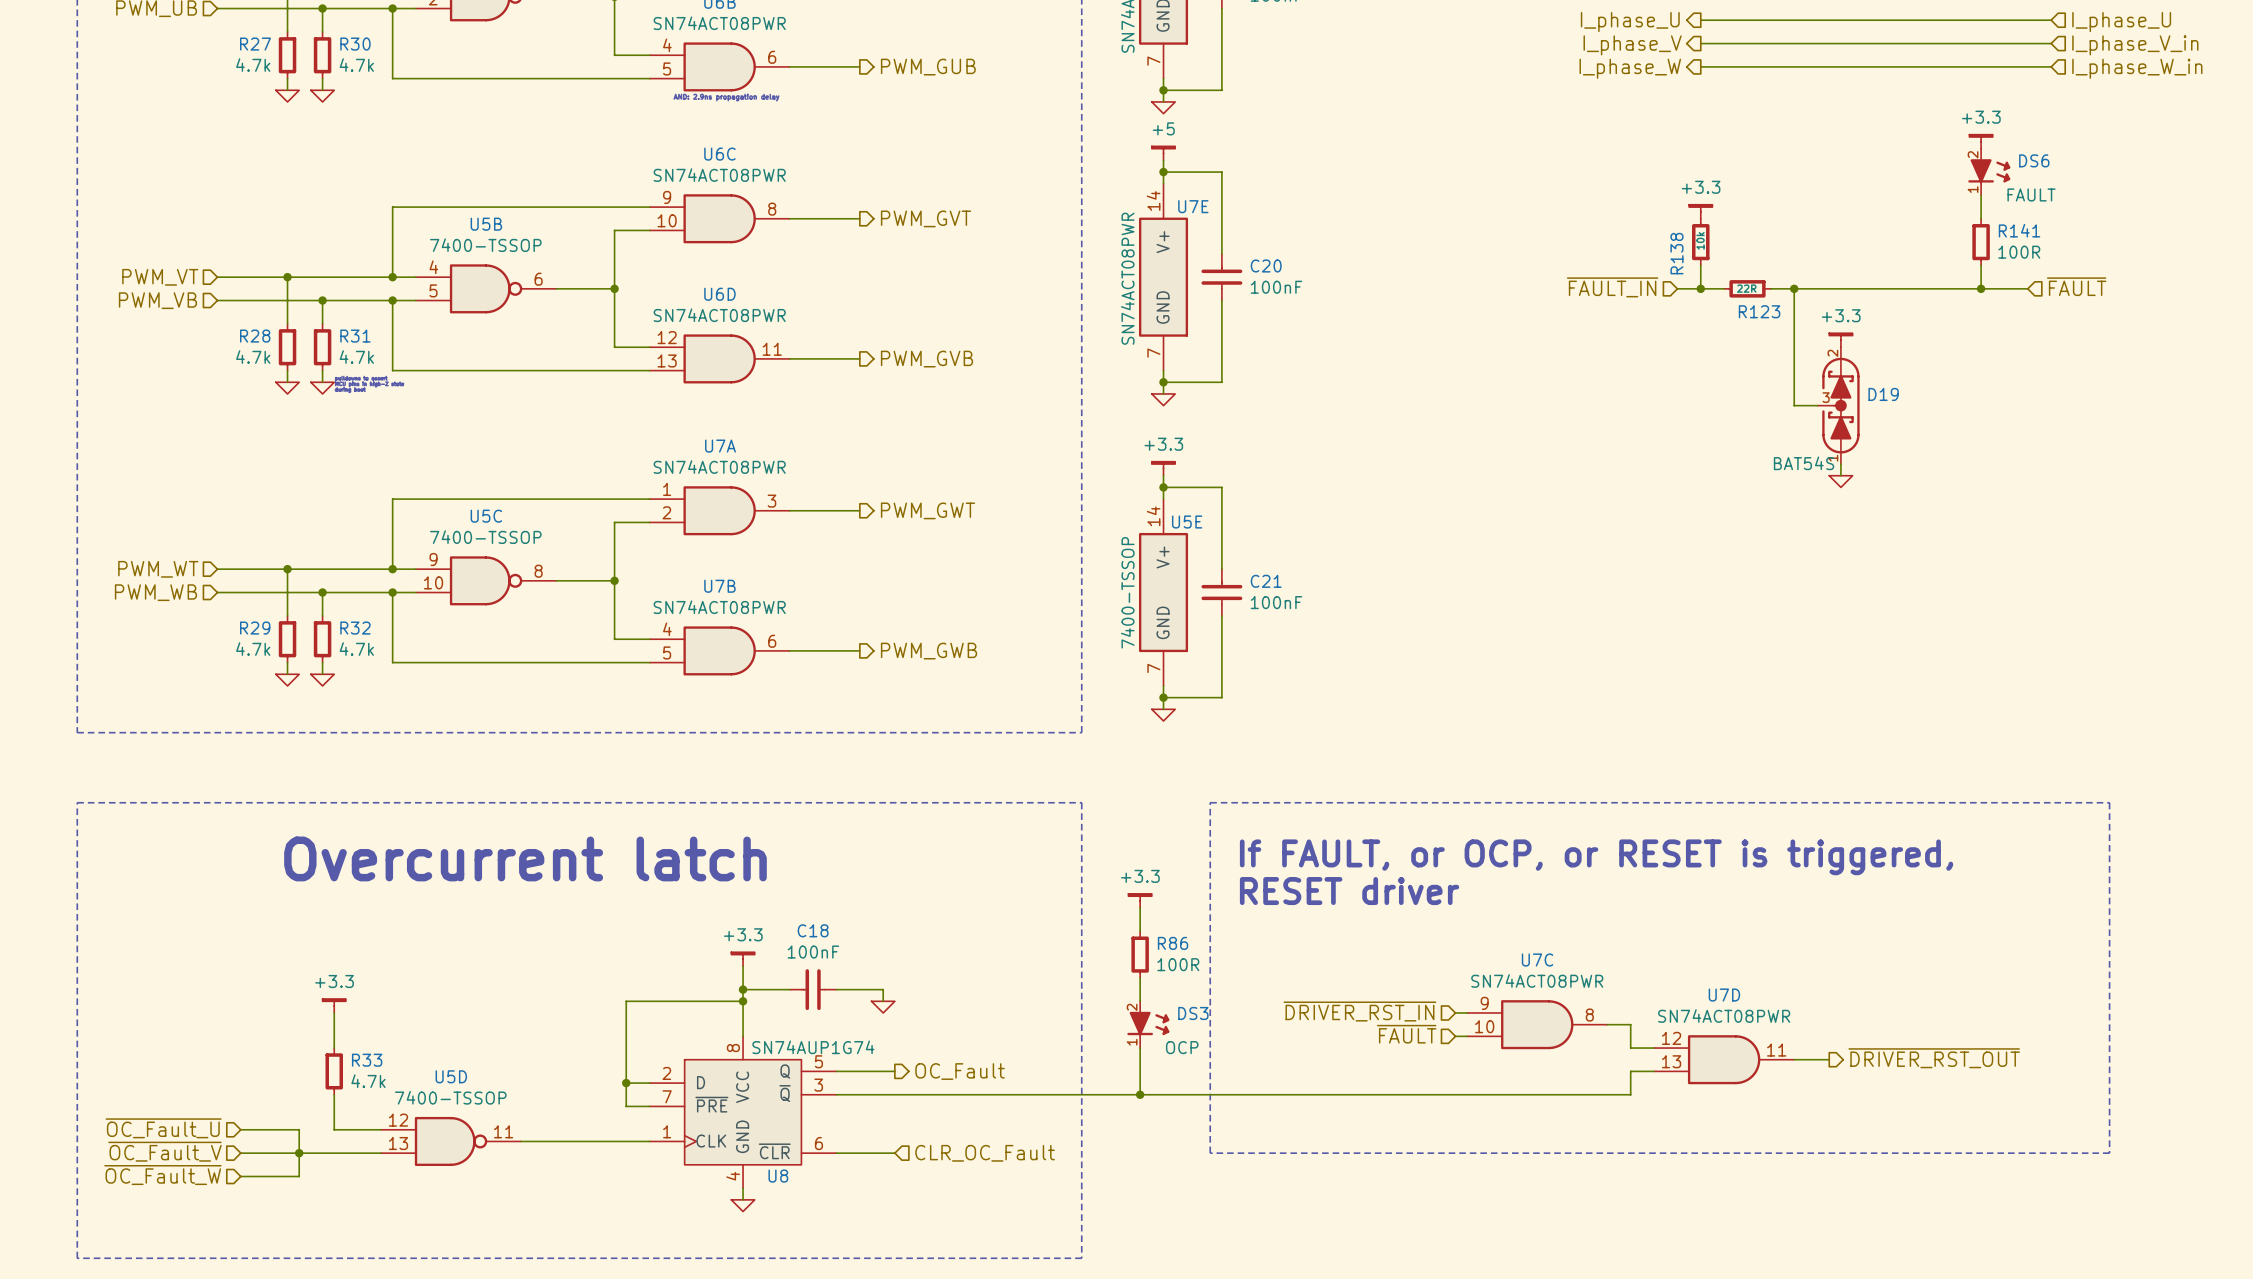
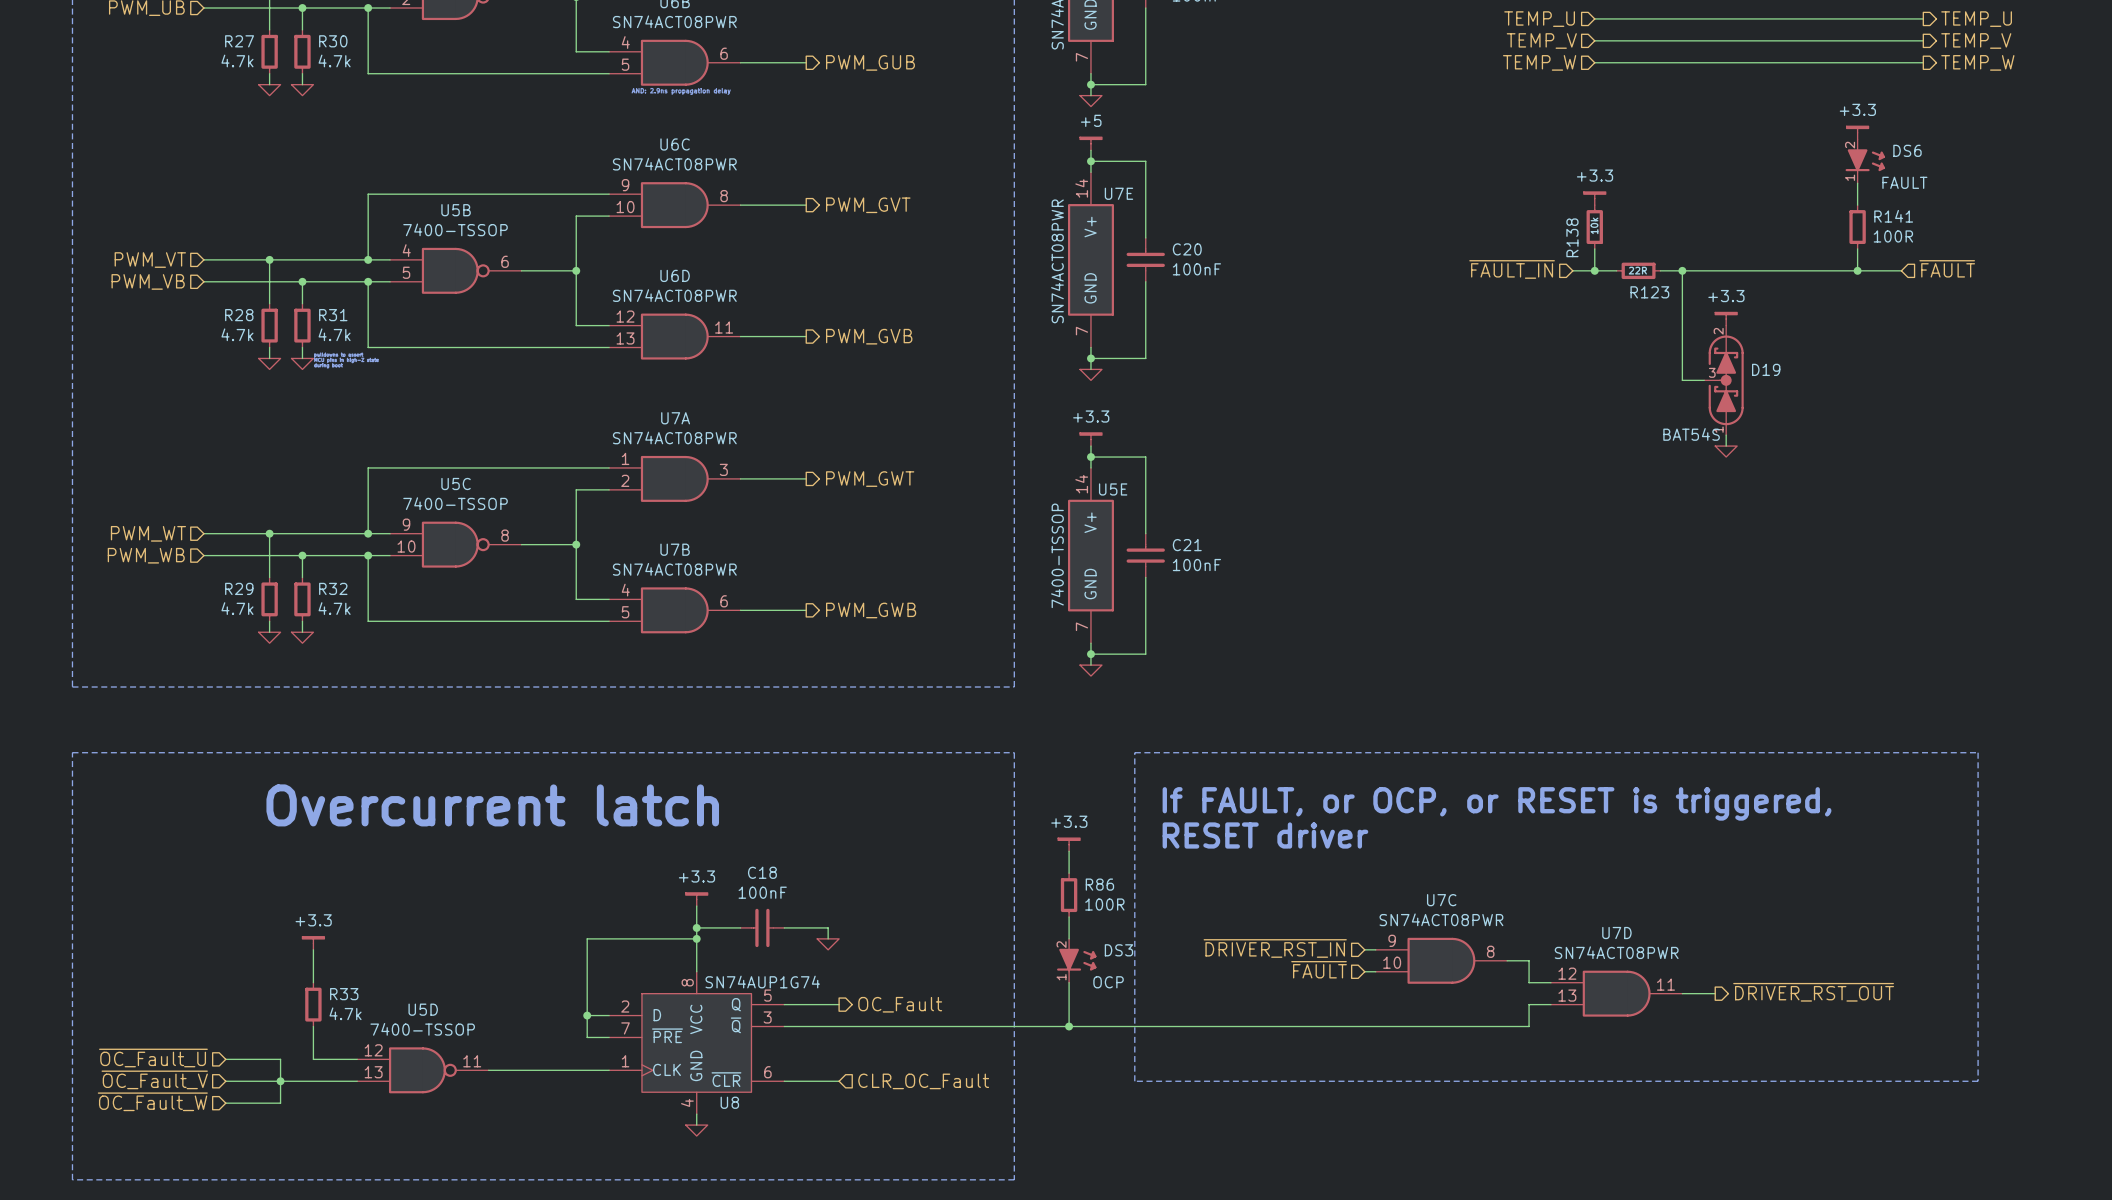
hierarchical label shape: output (1630, 22) -> input (1539, 19)
hierarchical label: I_phase_U (1630, 22) -> TEMP_U (1539, 19)
hierarchical label shape: input (2121, 22) -> output (1976, 19)
hierarchical label: I_phase_U (2121, 22) -> TEMP_U (1976, 19)
hierarchical label shape: output (1632, 45) -> input (1541, 40)
hierarchical label: I_phase_V (1632, 45) -> TEMP_V (1541, 40)
hierarchical label shape: input (2135, 45) -> output (1976, 40)
hierarchical label: I_phase_V_in (2135, 45) -> TEMP_V (1976, 40)
hierarchical label shape: output (1630, 68) -> input (1539, 62)
hierarchical label: I_phase_W (1630, 68) -> TEMP_W (1539, 62)
hierarchical label shape: input (2137, 68) -> output (1977, 62)
hierarchical label: I_phase_W_in (2137, 68) -> TEMP_W (1977, 62)

